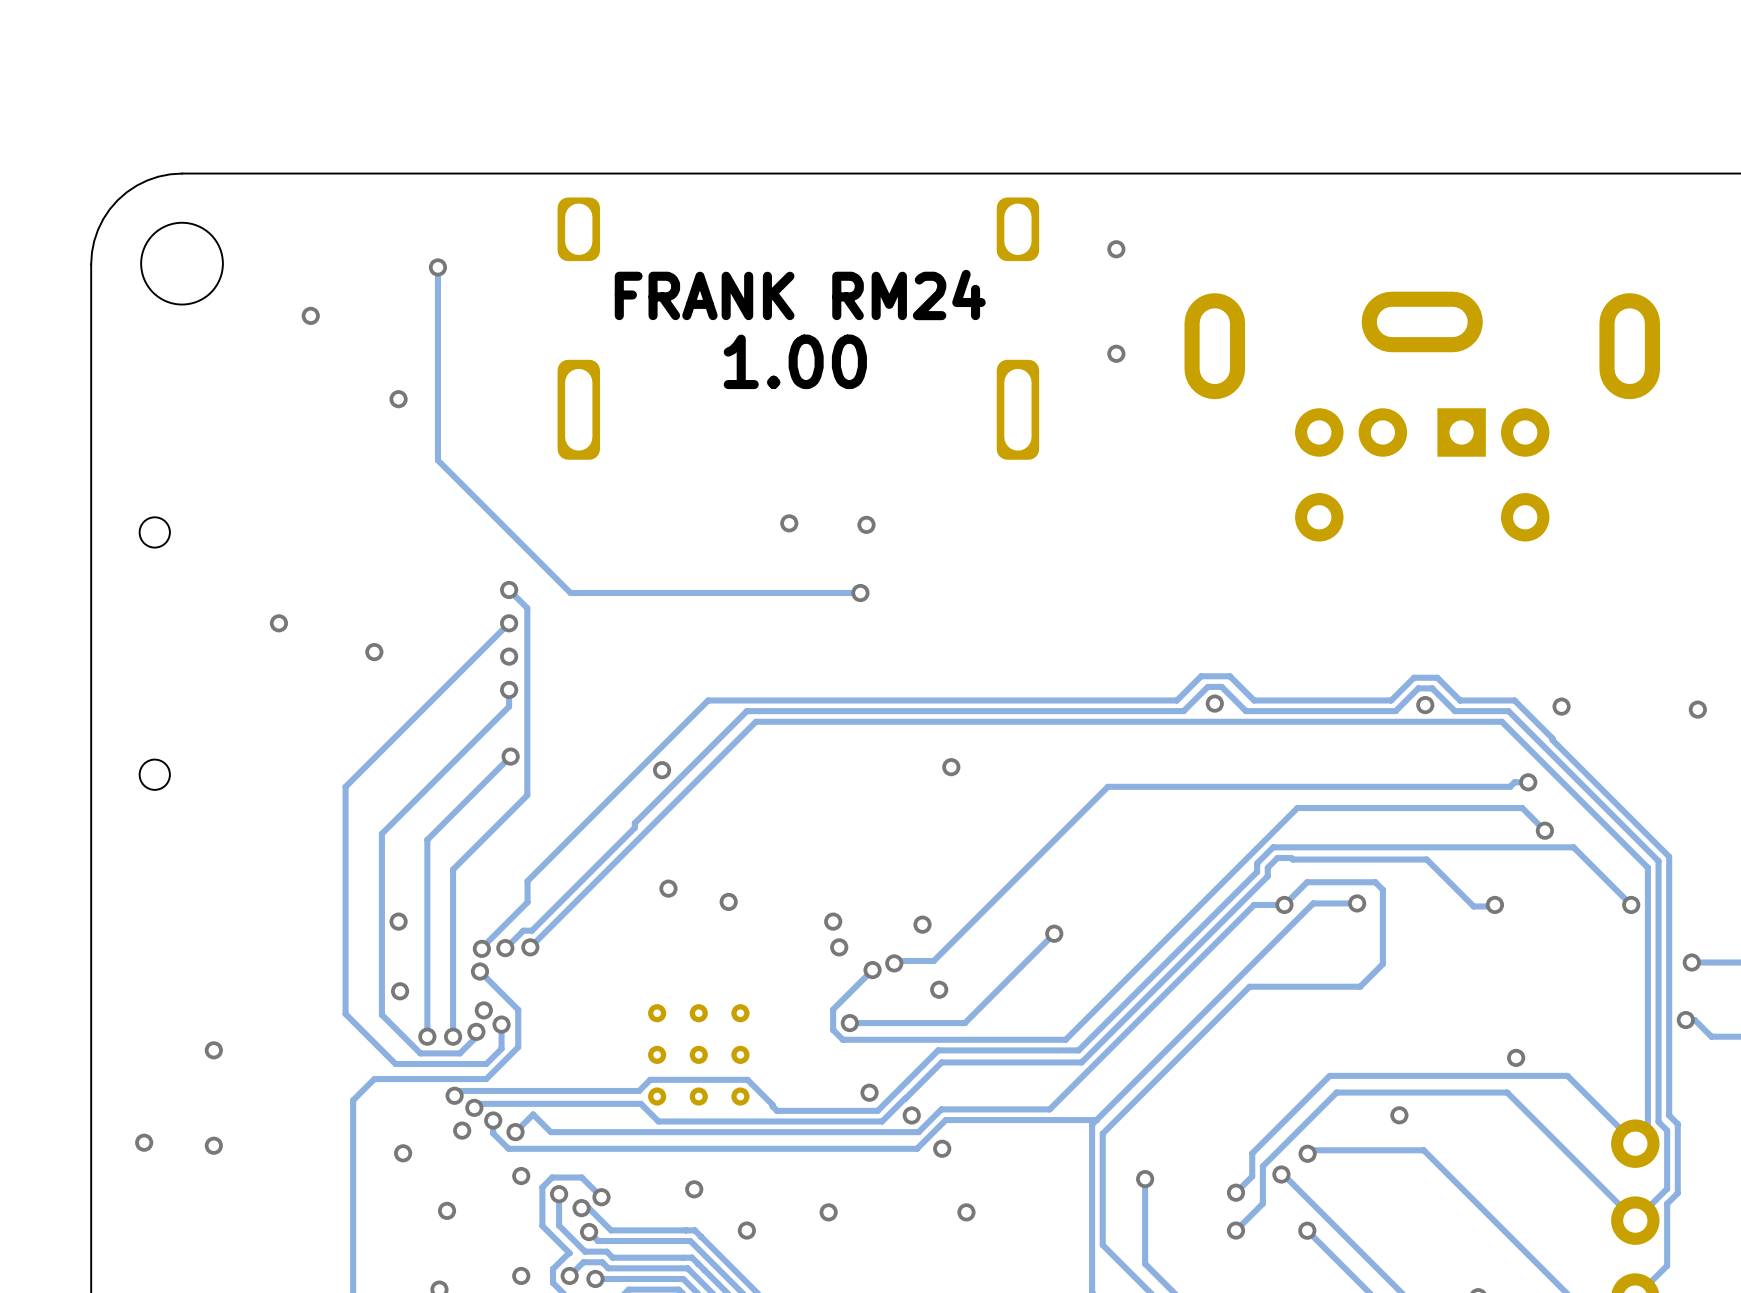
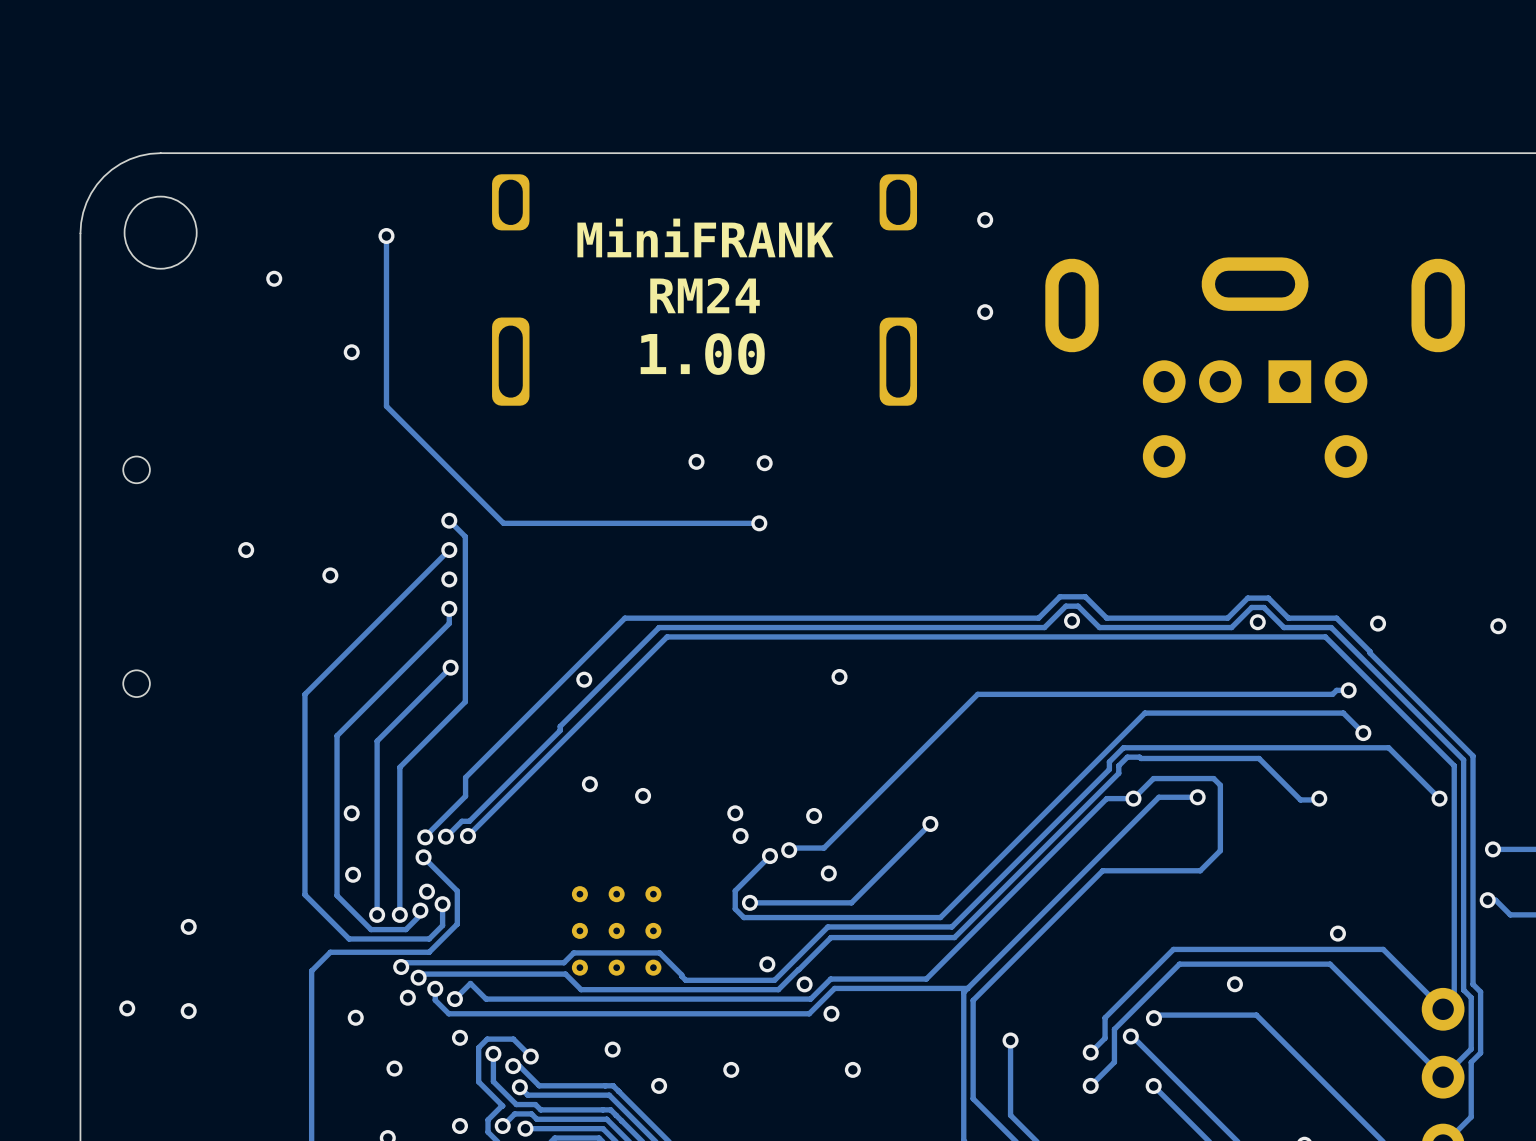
text: none -> MiniFRANK (705, 237)
text: FRANK RM24 (800, 295) -> none
text: none -> RM24 (705, 295)
text position: 1.00 (795, 361) -> 1.00 (702, 354)

